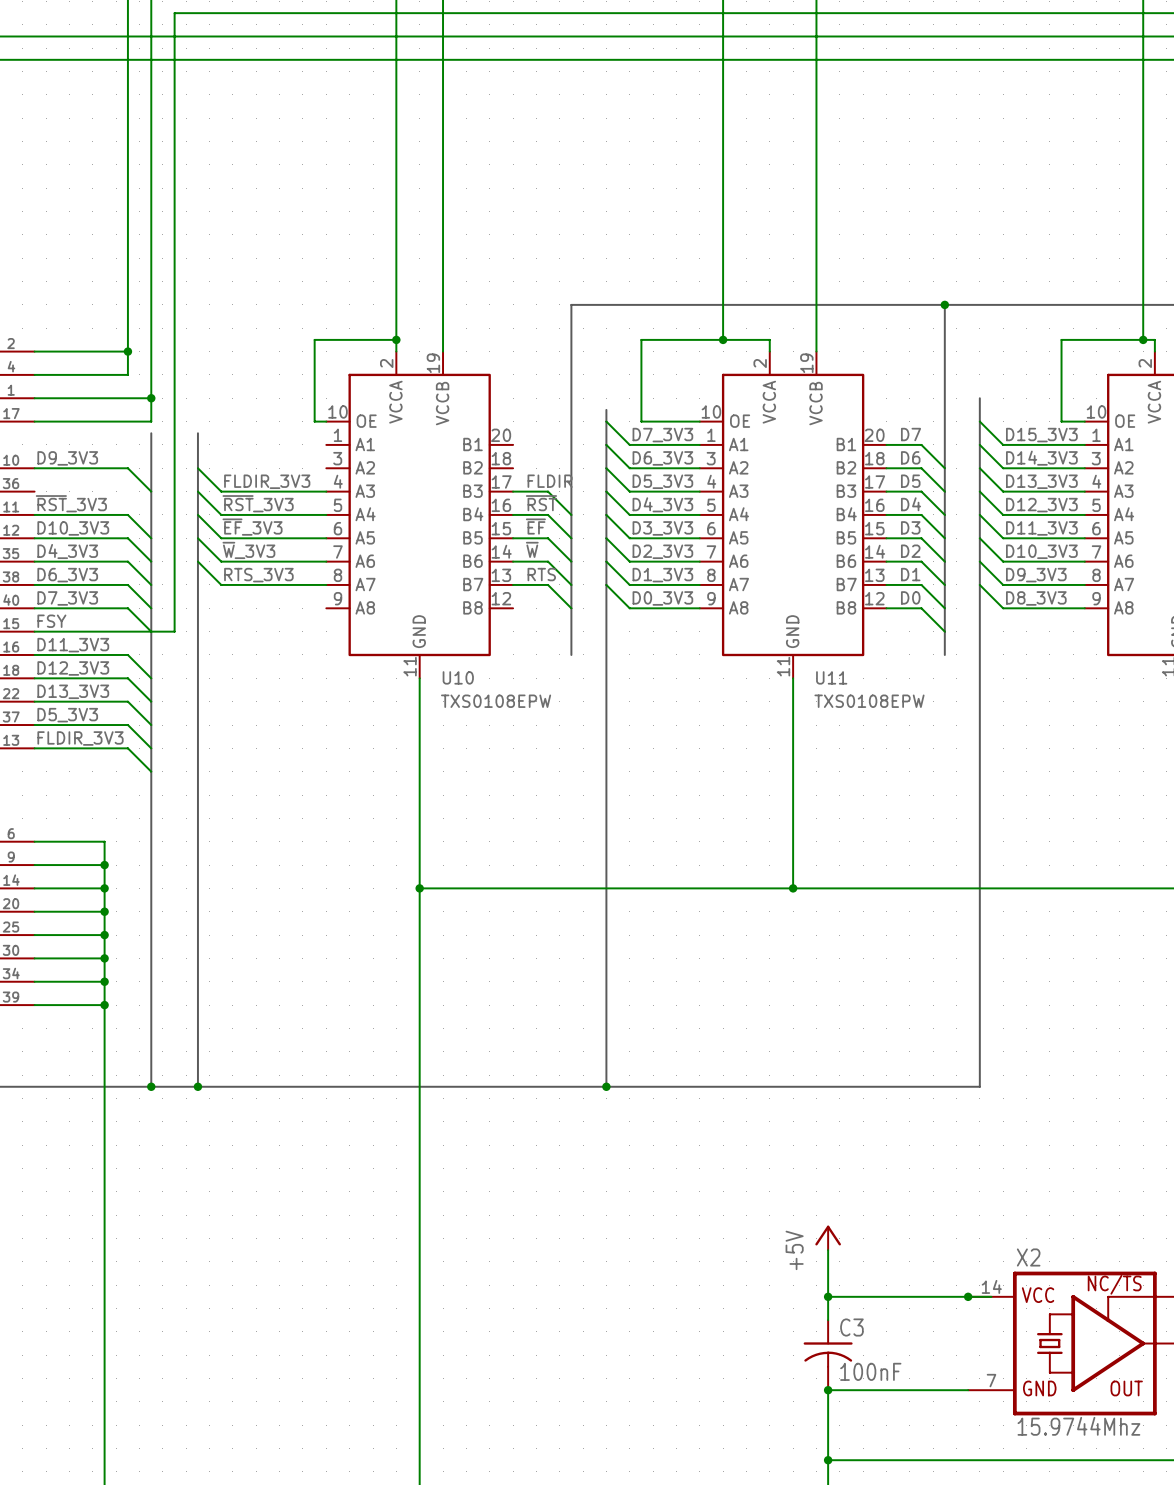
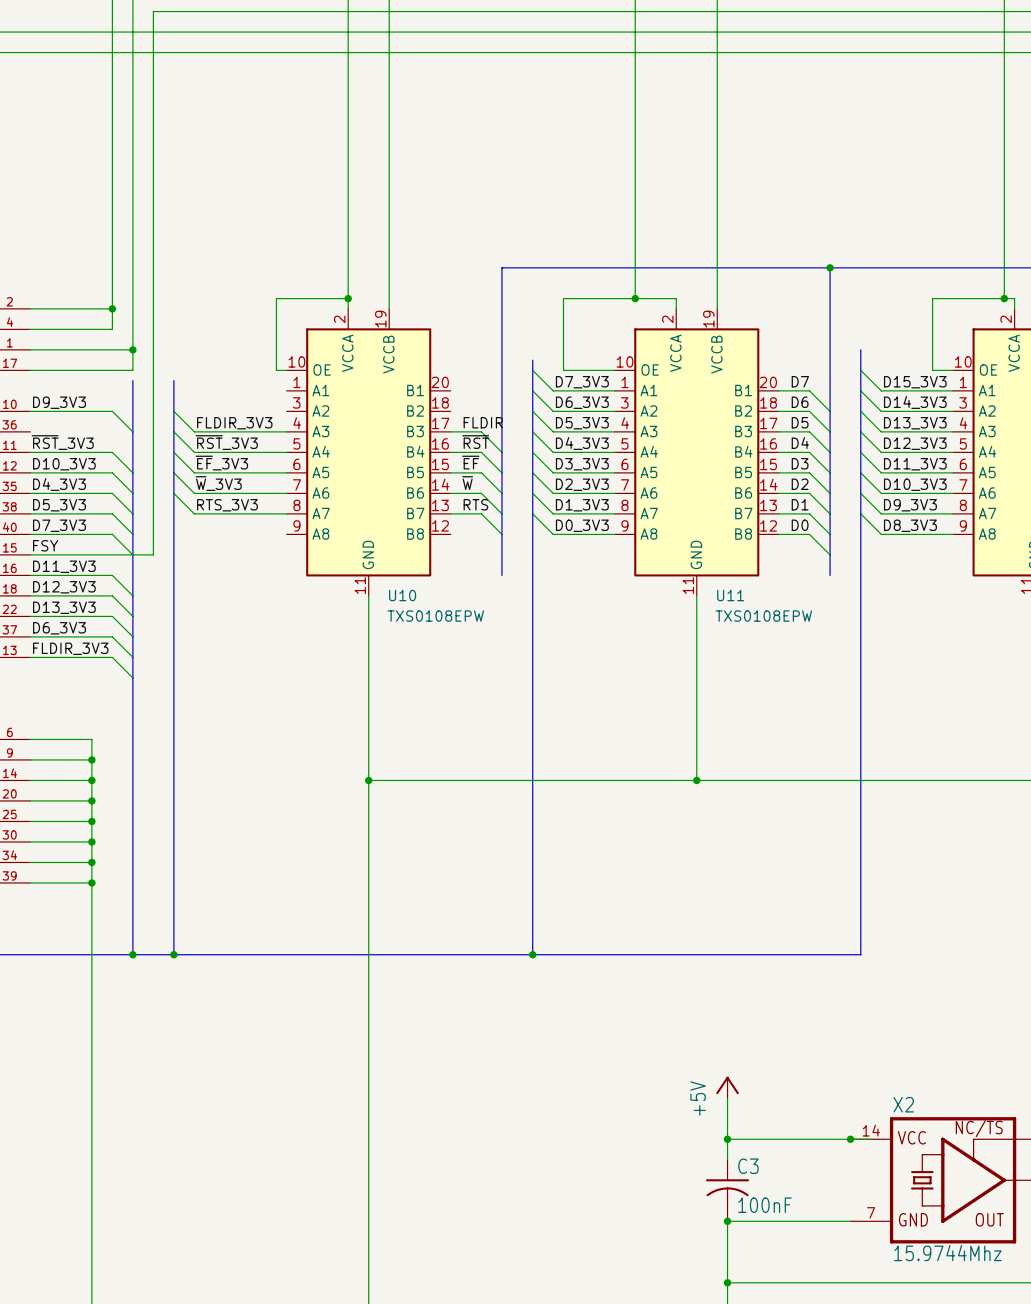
label: D6_3V3 (67, 575) -> D5_3V3 (59, 505)
label: D5_3V3 (67, 715) -> D6_3V3 (59, 628)

